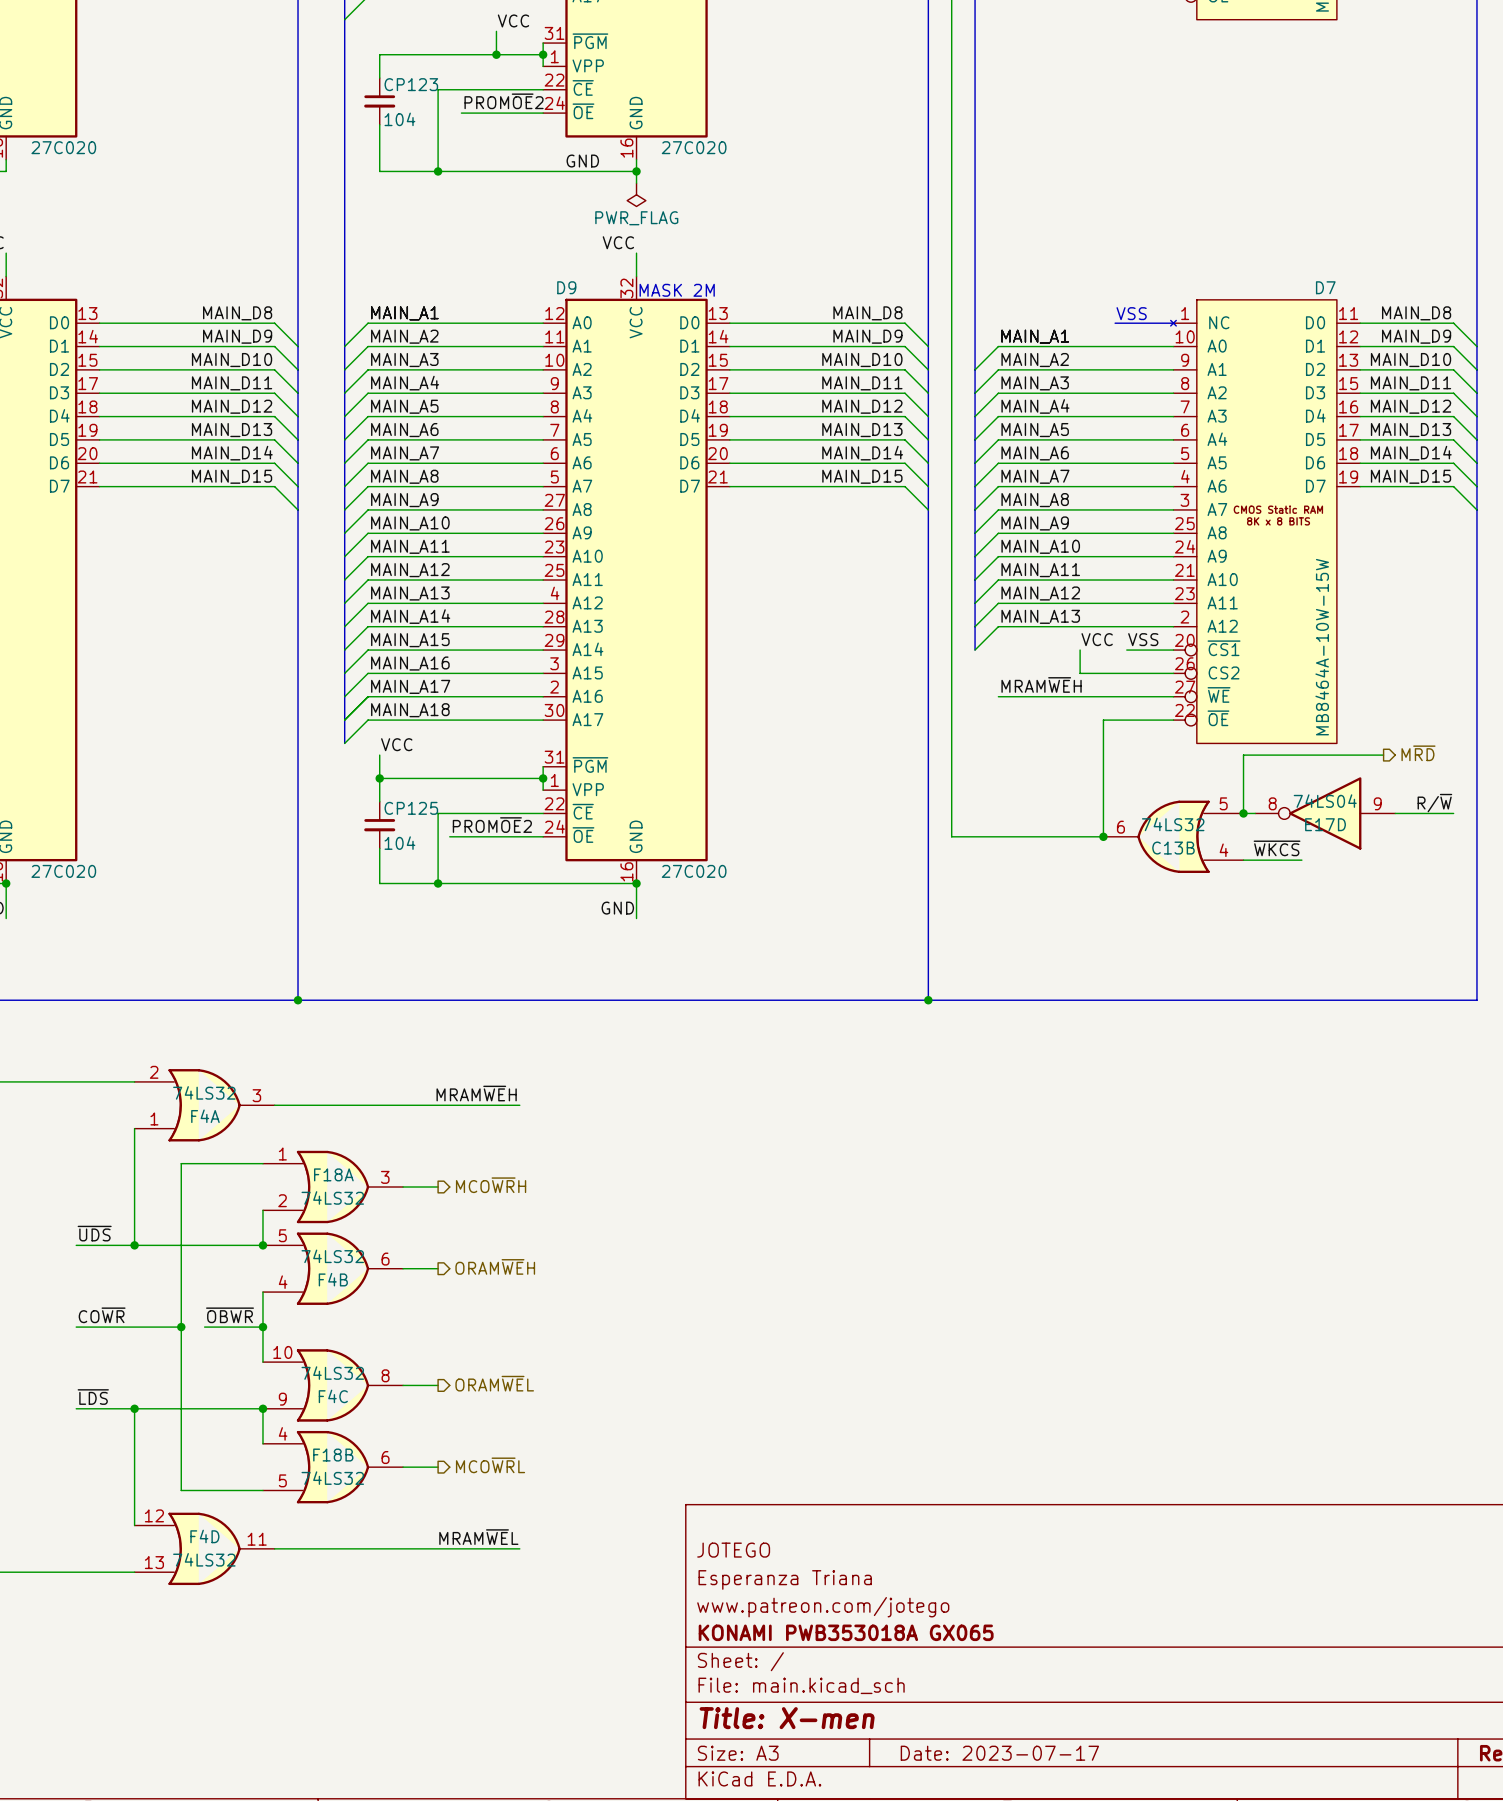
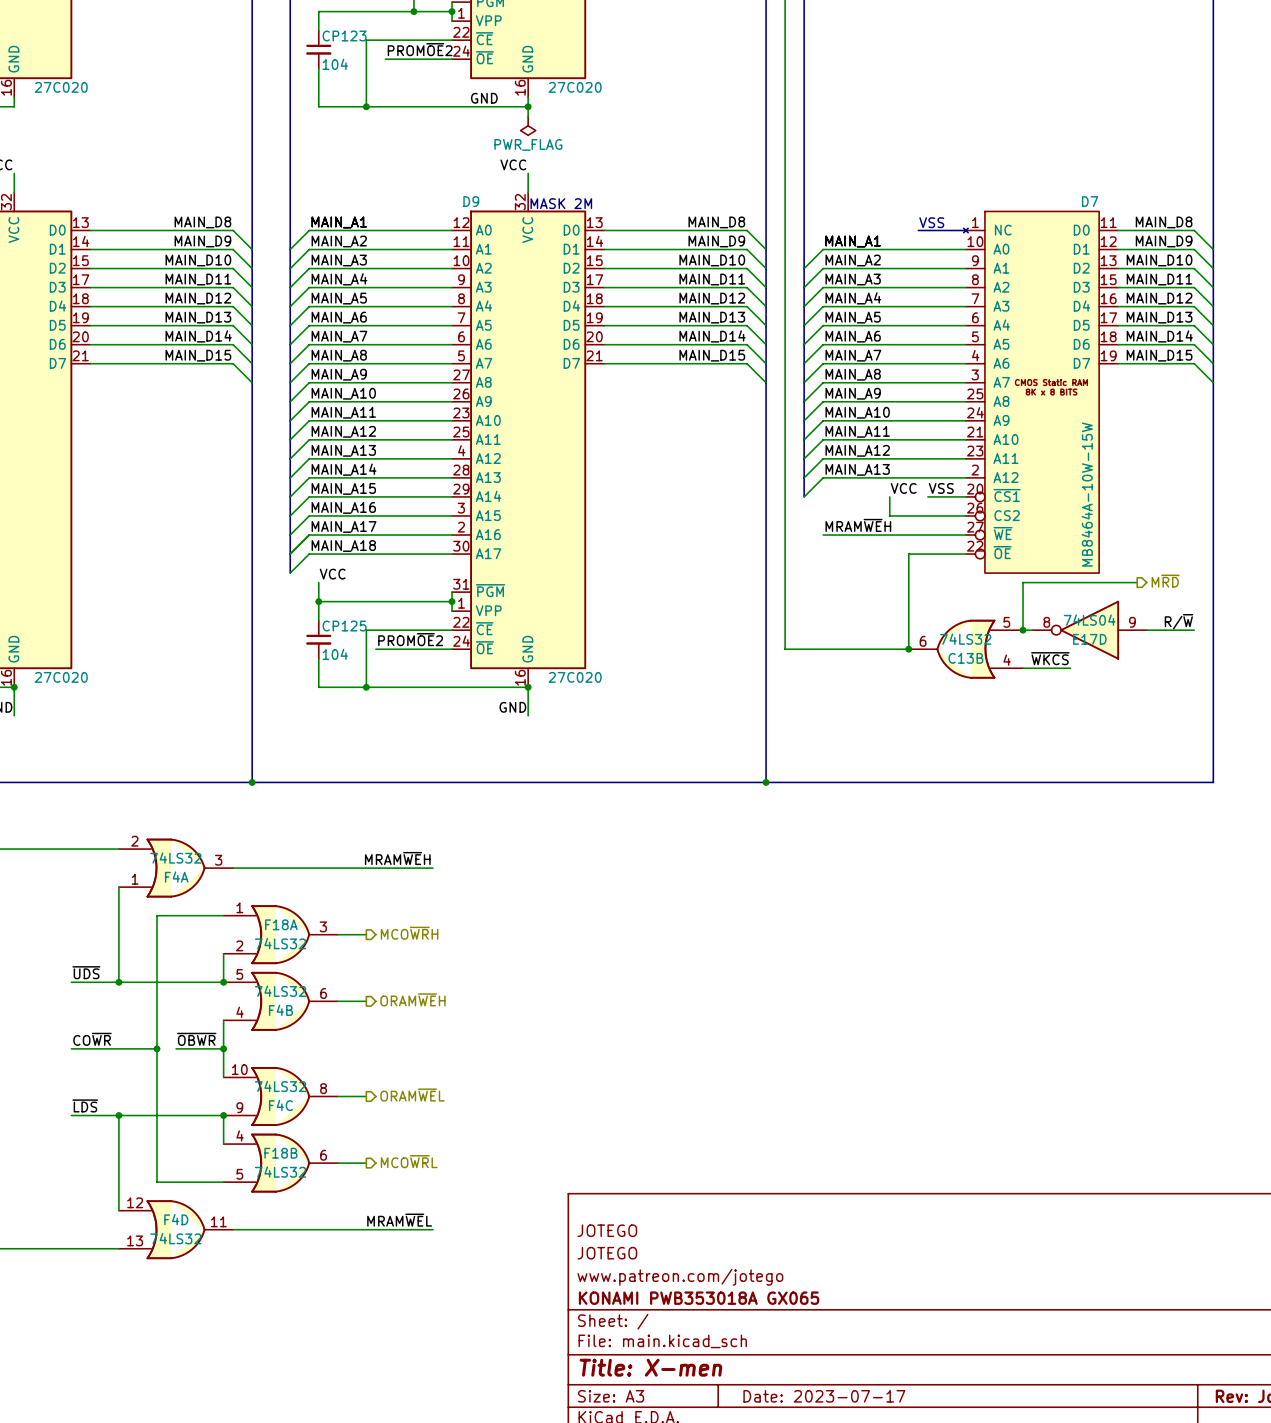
title block: Esperanza Triana (785, 1579) -> JOTEGO (607, 1253)

